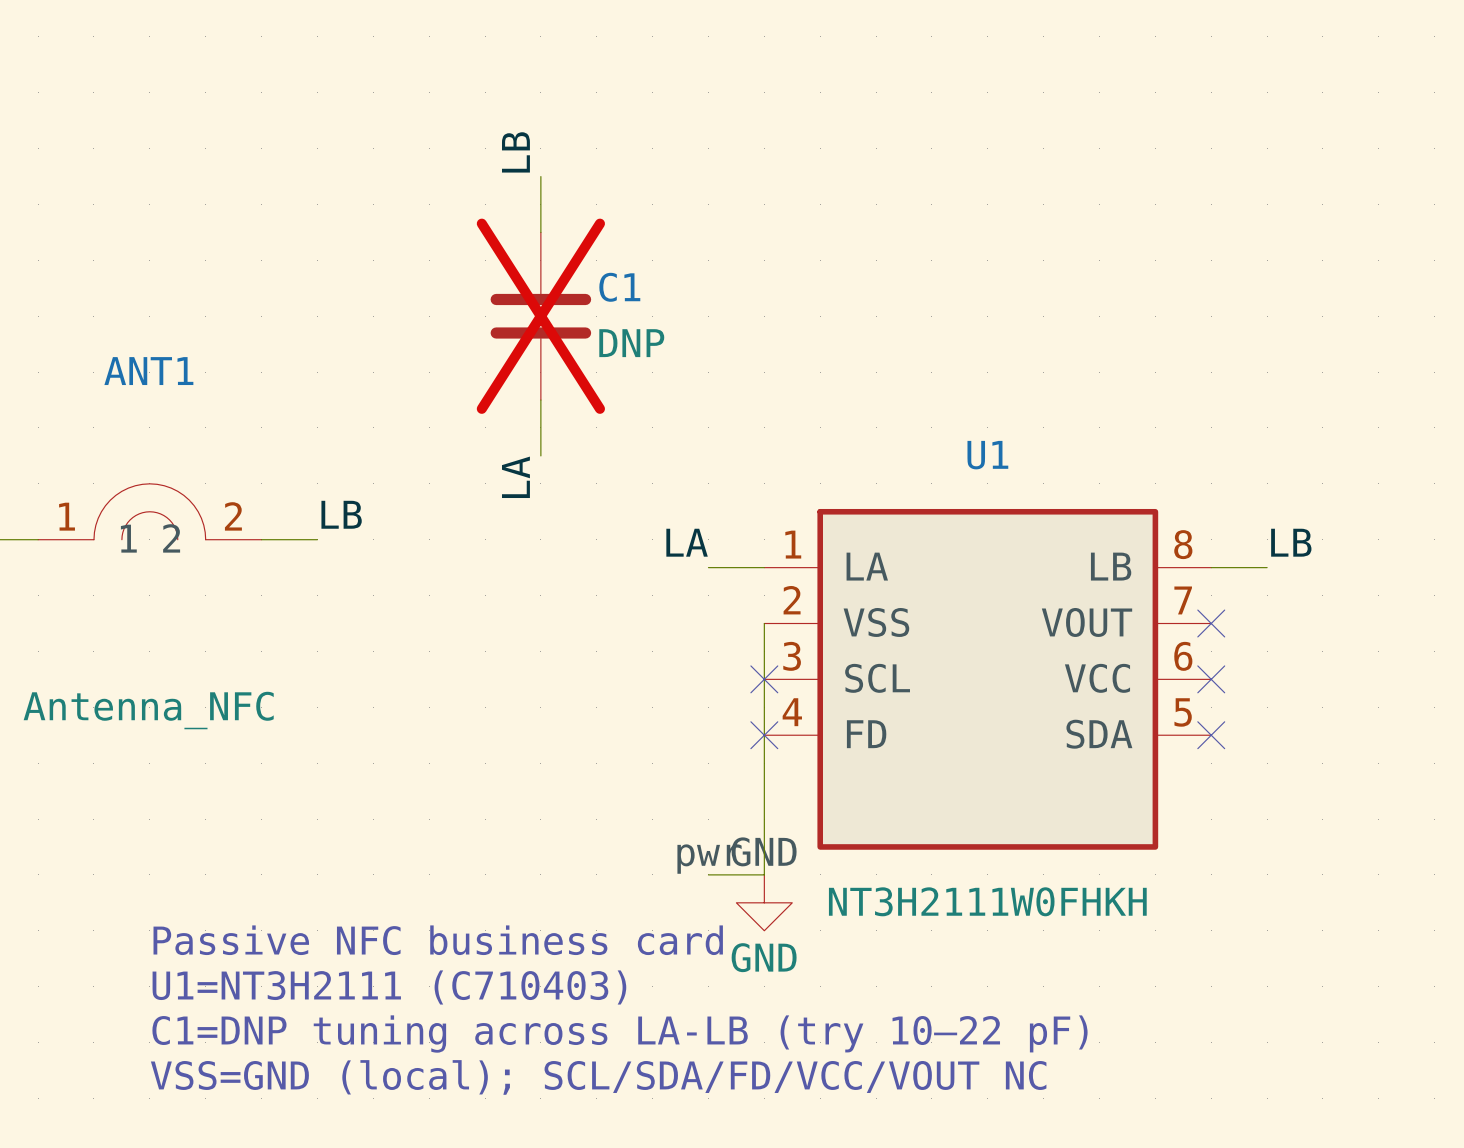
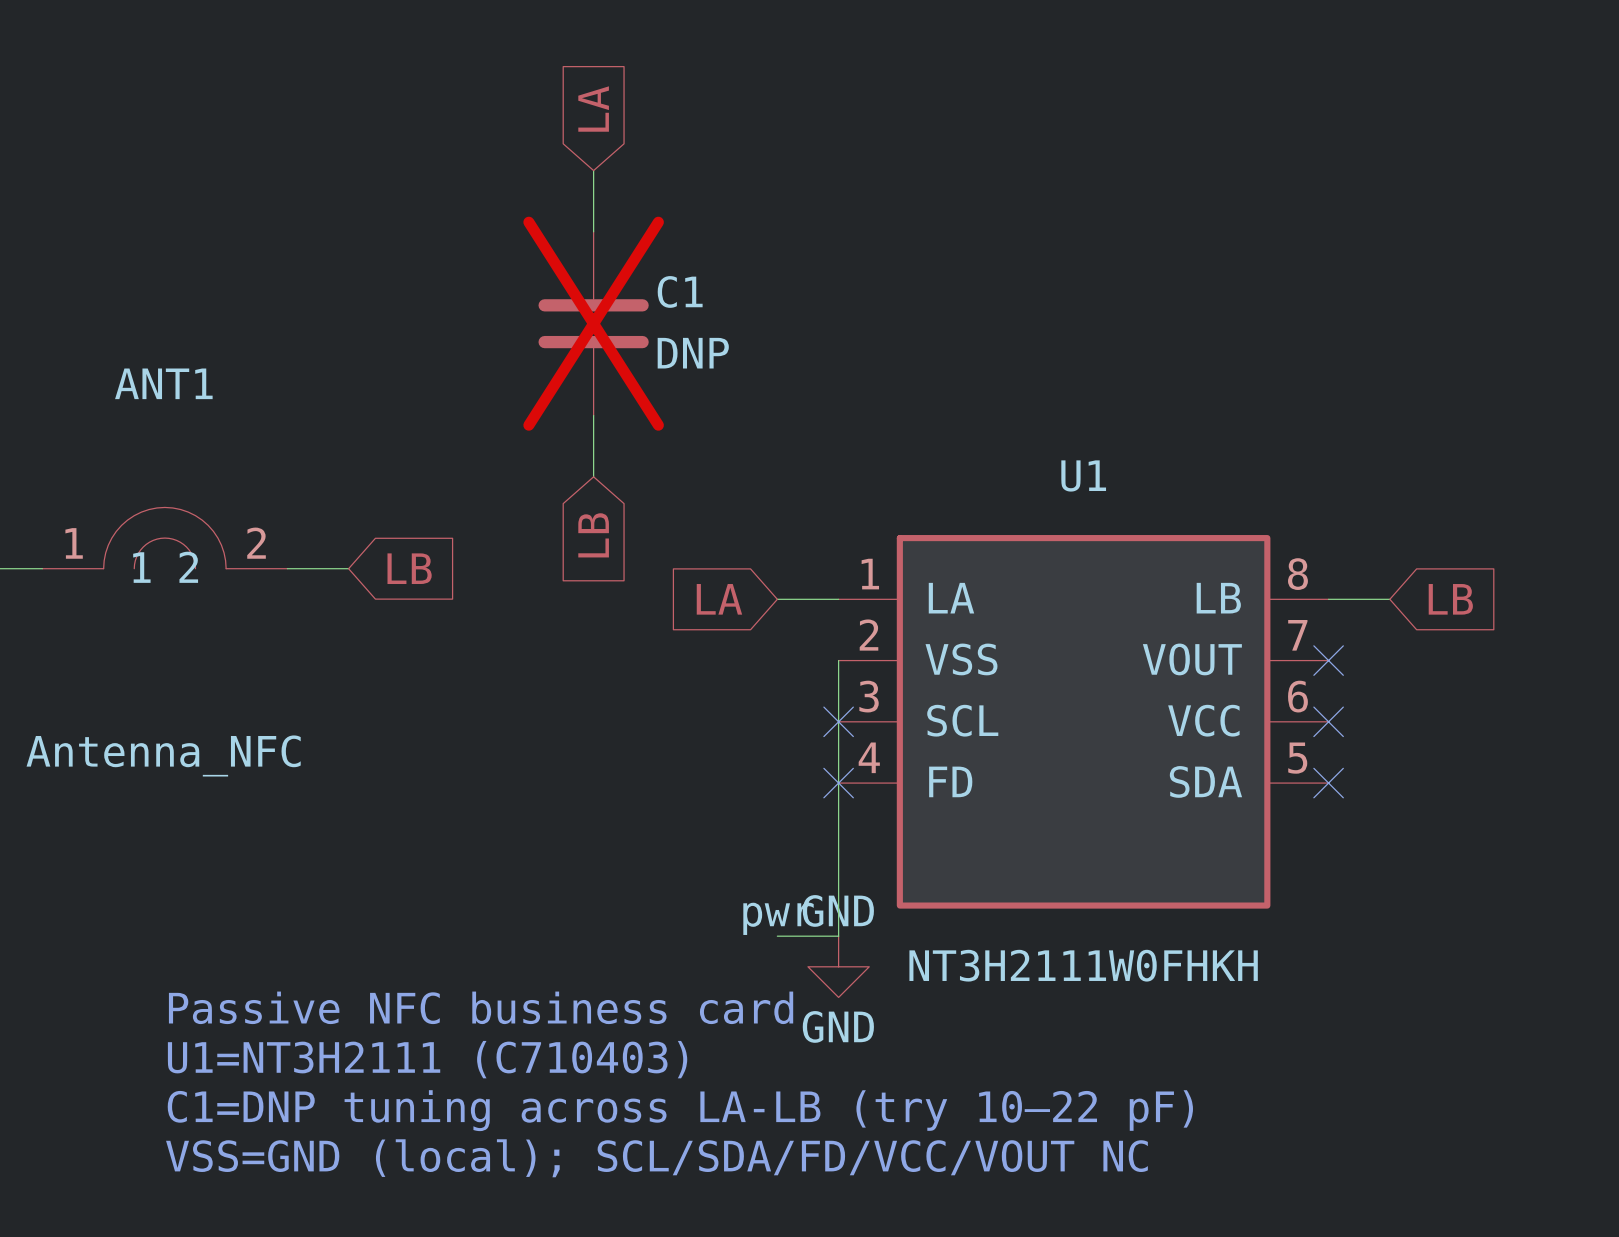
global label: none -> LA (593, 109)
label: LB (515, 152) -> none
label: LA (515, 477) -> none
global label: none -> LB (593, 535)
label: LB (341, 514) -> none
global label: none -> LB (409, 568)
label: LA (687, 542) -> none
label: LB (1291, 542) -> none
global label: none -> LA (719, 599)
global label: none -> LB (1450, 599)

